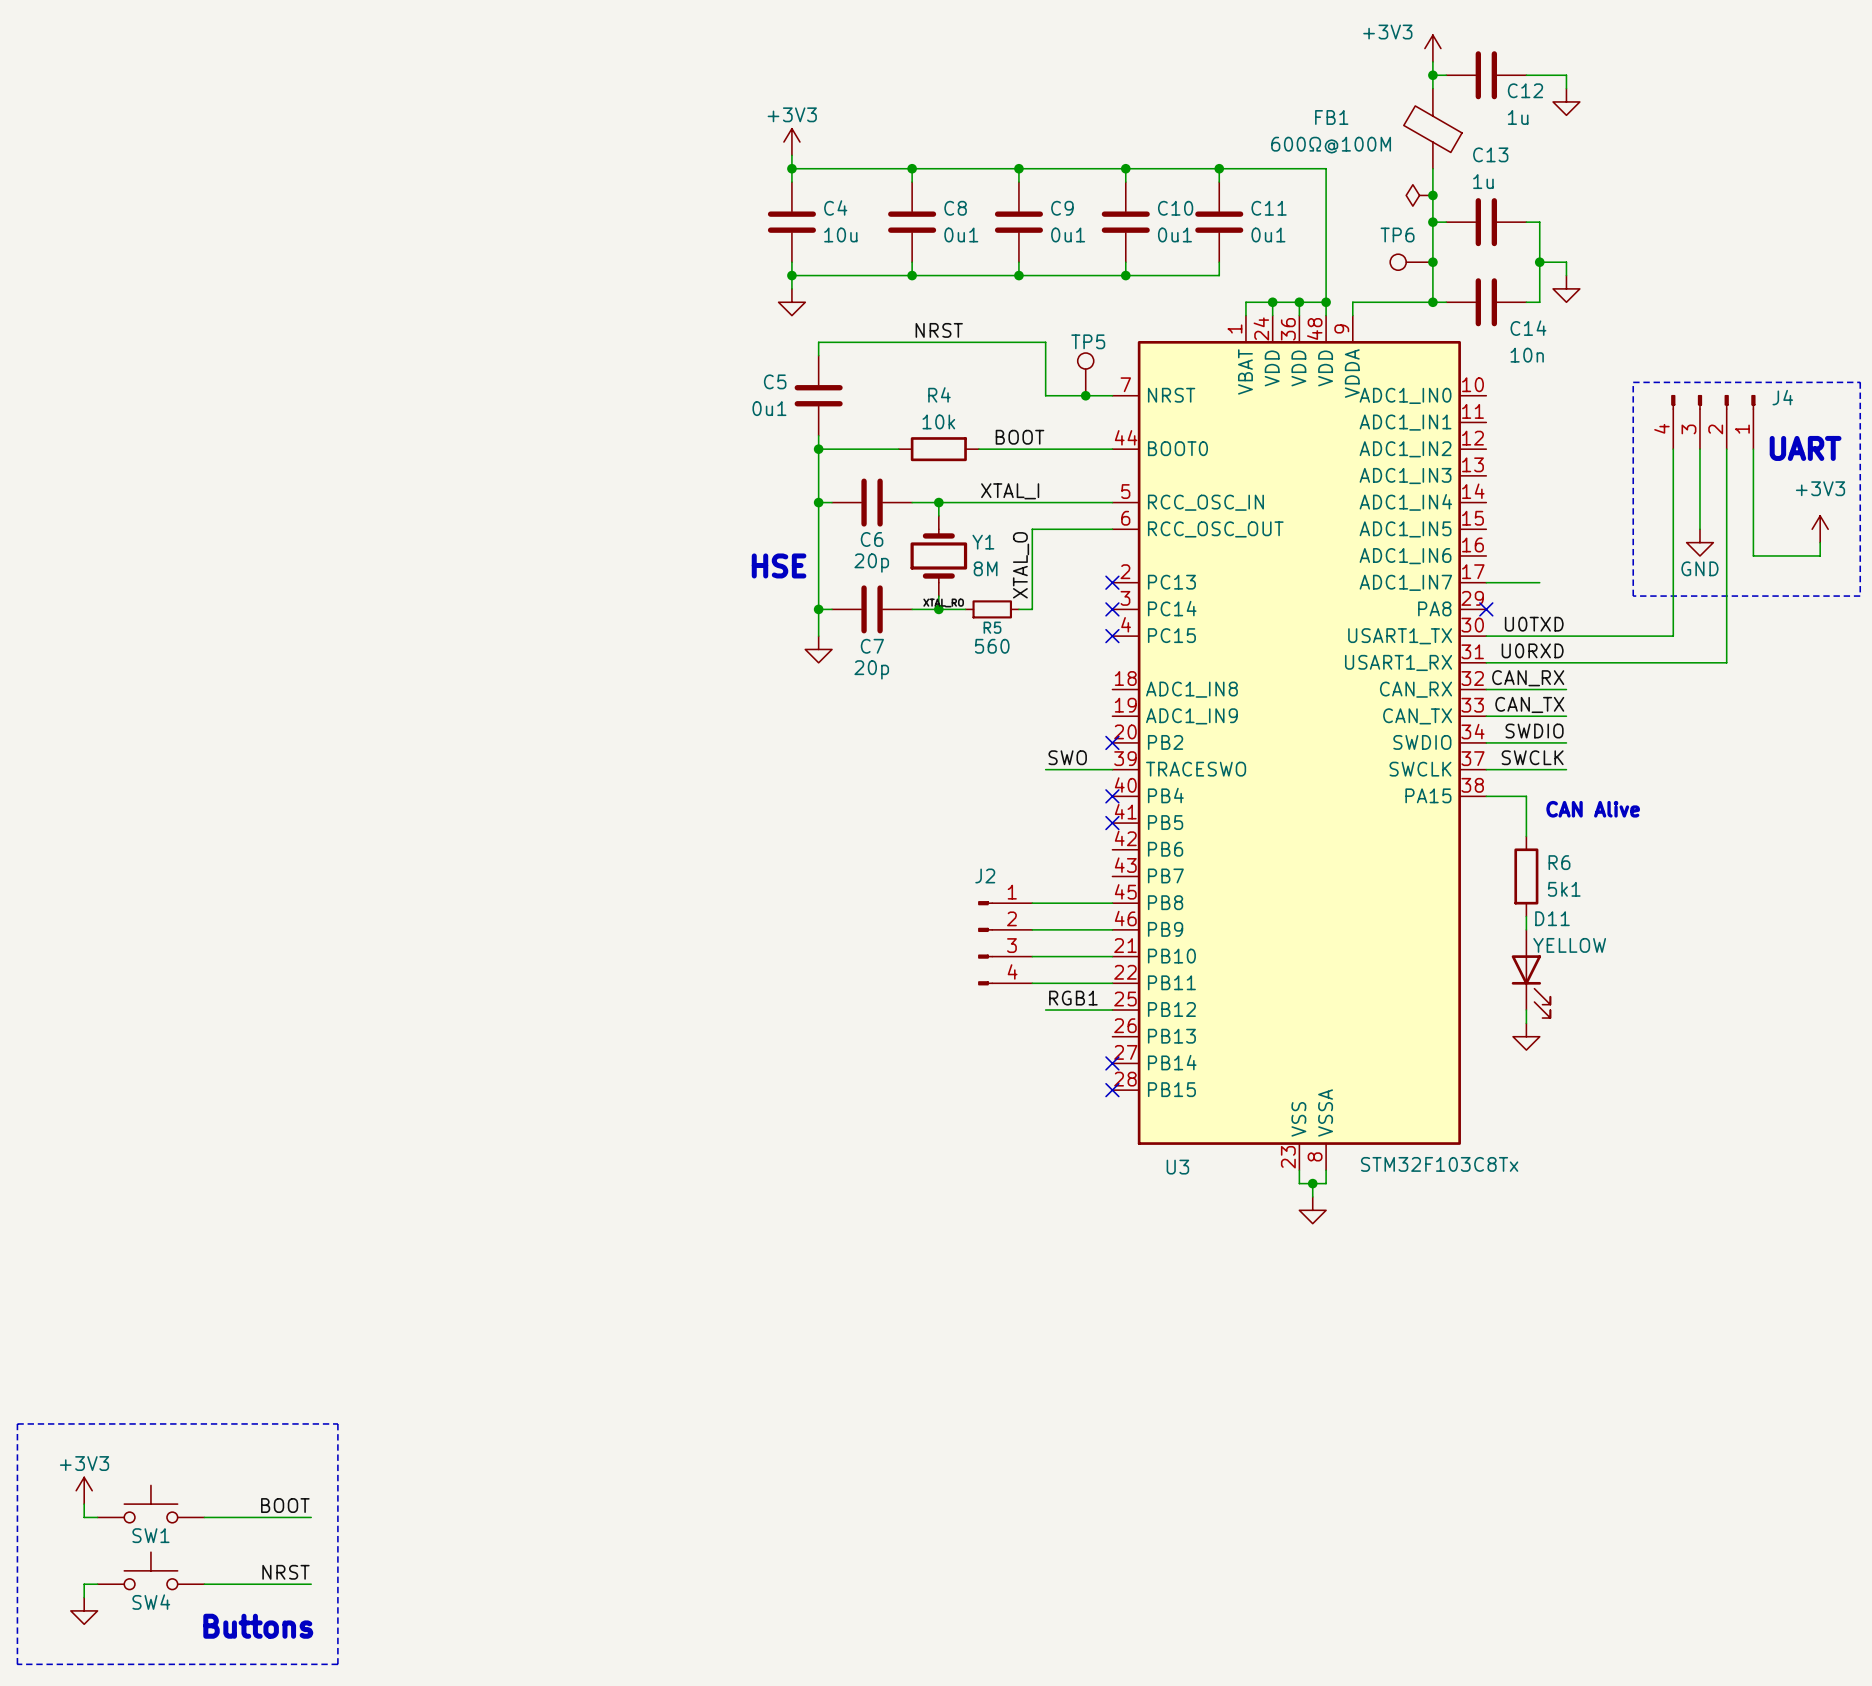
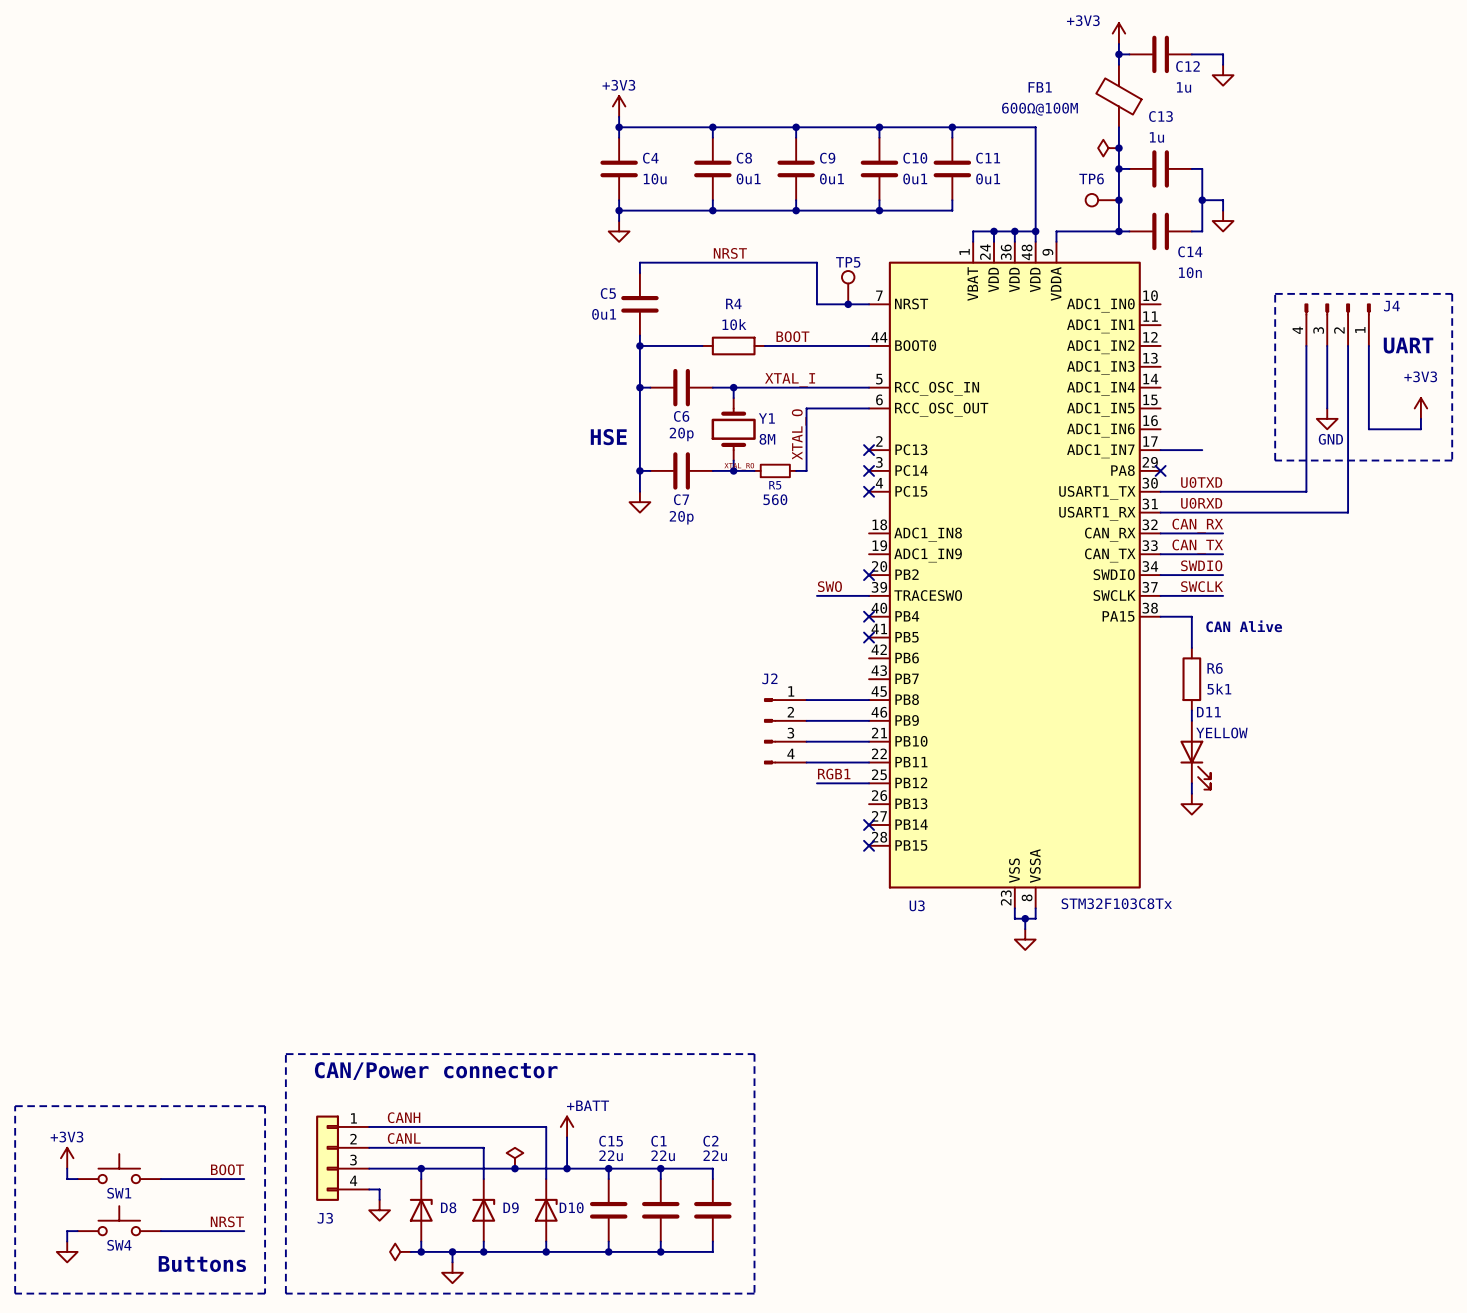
line: none -> (285, 1054) (754, 1054) (754, 1293) (285, 1293) (285, 1054)
text: none -> CAN/Power connector (436, 1071)
label: none -> CANH (404, 1117)
wire: none -> (369, 1126) (546, 1126) (546, 1179)
power symbol: none -> +BATT (567, 1126)
wire: none -> (567, 1137) (567, 1168)
label: none -> CANL (404, 1138)
wire: none -> (369, 1147) (483, 1147) (483, 1179)
J3: none -> (342, 1158)
power symbol: none -> (514, 1158)
wire: none -> (369, 1168) (712, 1168) (712, 1179)
wire: none -> (421, 1168) (421, 1179)
junction: none -> (421, 1168)
junction: none -> (514, 1168)
junction: none -> (567, 1168)
wire: none -> (608, 1168) (608, 1179)
junction: none -> (608, 1168)
wire: none -> (660, 1168) (660, 1179)
junction: none -> (660, 1168)
wire: none -> (369, 1189) (379, 1189) (379, 1199)
power symbol: none -> (379, 1210)
D8: none -> (421, 1210)
D9: none -> (483, 1210)
D10: none -> (546, 1210)
C15: none -> 22u (608, 1210)
C1: none -> 22u (660, 1210)
C2: none -> 22u (712, 1210)
wire: none -> (421, 1241) (421, 1251)
wire: none -> (483, 1241) (483, 1251)
wire: none -> (546, 1241) (546, 1251)
wire: none -> (608, 1241) (608, 1251)
wire: none -> (660, 1241) (660, 1251)
wire: none -> (712, 1241) (712, 1251) (410, 1251)
power symbol: none -> (400, 1251)
junction: none -> (421, 1251)
wire: none -> (452, 1251) (452, 1262)
junction: none -> (452, 1251)
junction: none -> (483, 1251)
junction: none -> (546, 1251)
junction: none -> (608, 1251)
junction: none -> (660, 1251)
power symbol: none -> (452, 1272)

